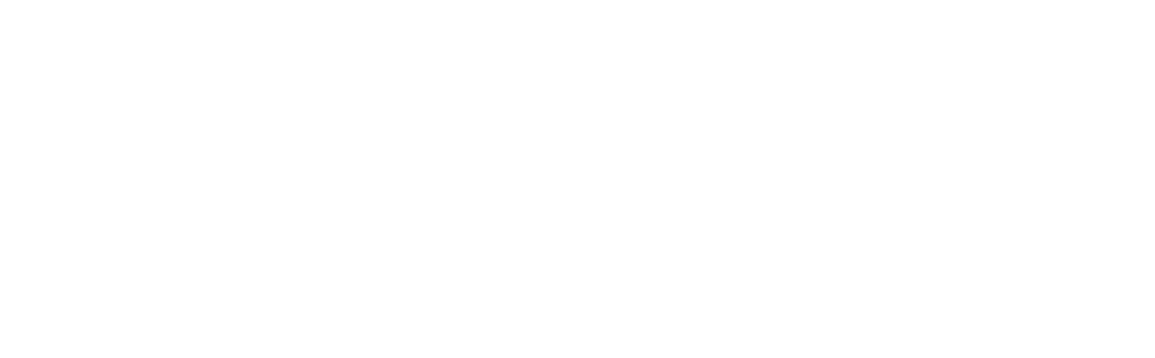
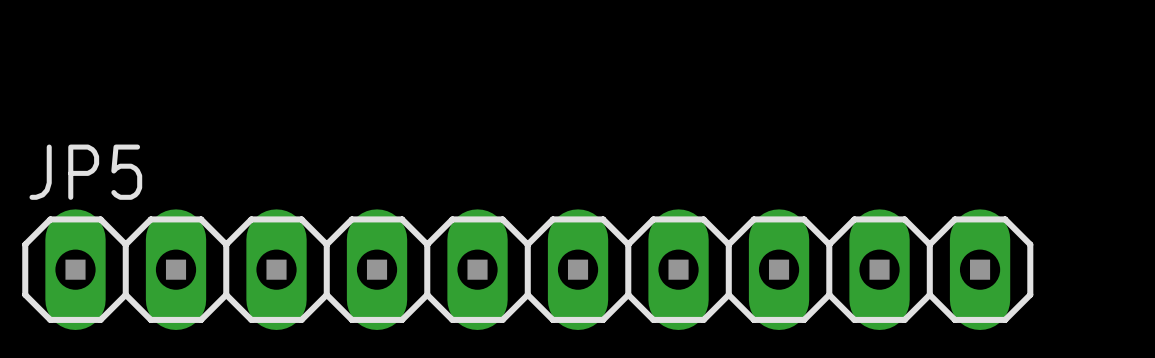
JP5: none -> (527, 269)

